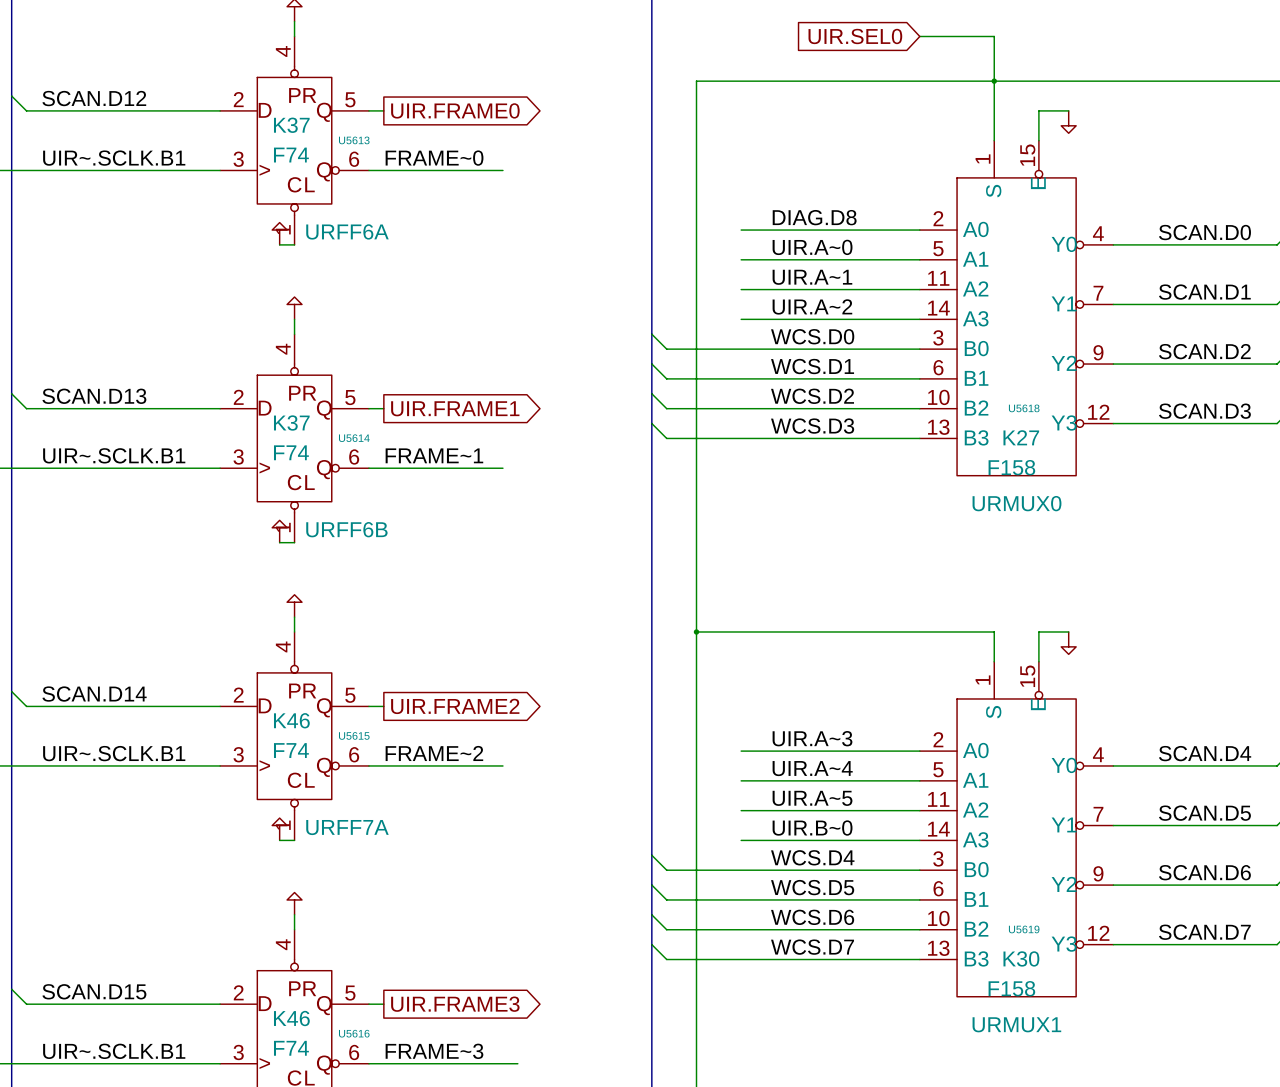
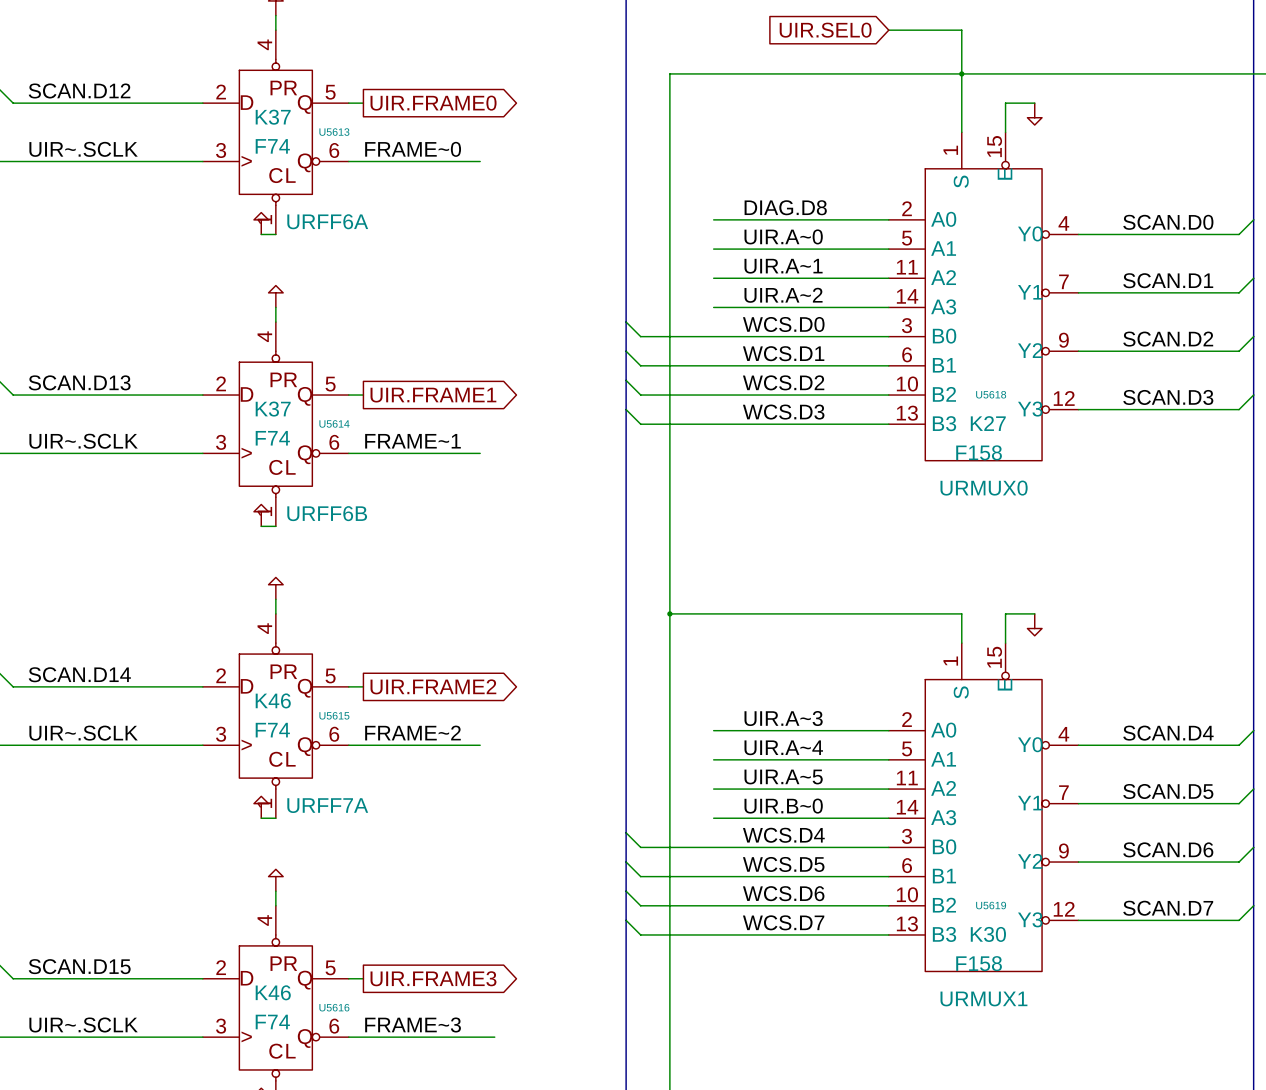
label: UIR~.SCLK.B1 (114, 158) -> UIR~.SCLK (83, 149)
label: UIR~.SCLK.B1 (114, 455) -> UIR~.SCLK (83, 441)
label: UIR~.SCLK.B1 (114, 753) -> UIR~.SCLK (83, 733)
label: UIR~.SCLK.B1 (114, 1051) -> UIR~.SCLK (83, 1024)

